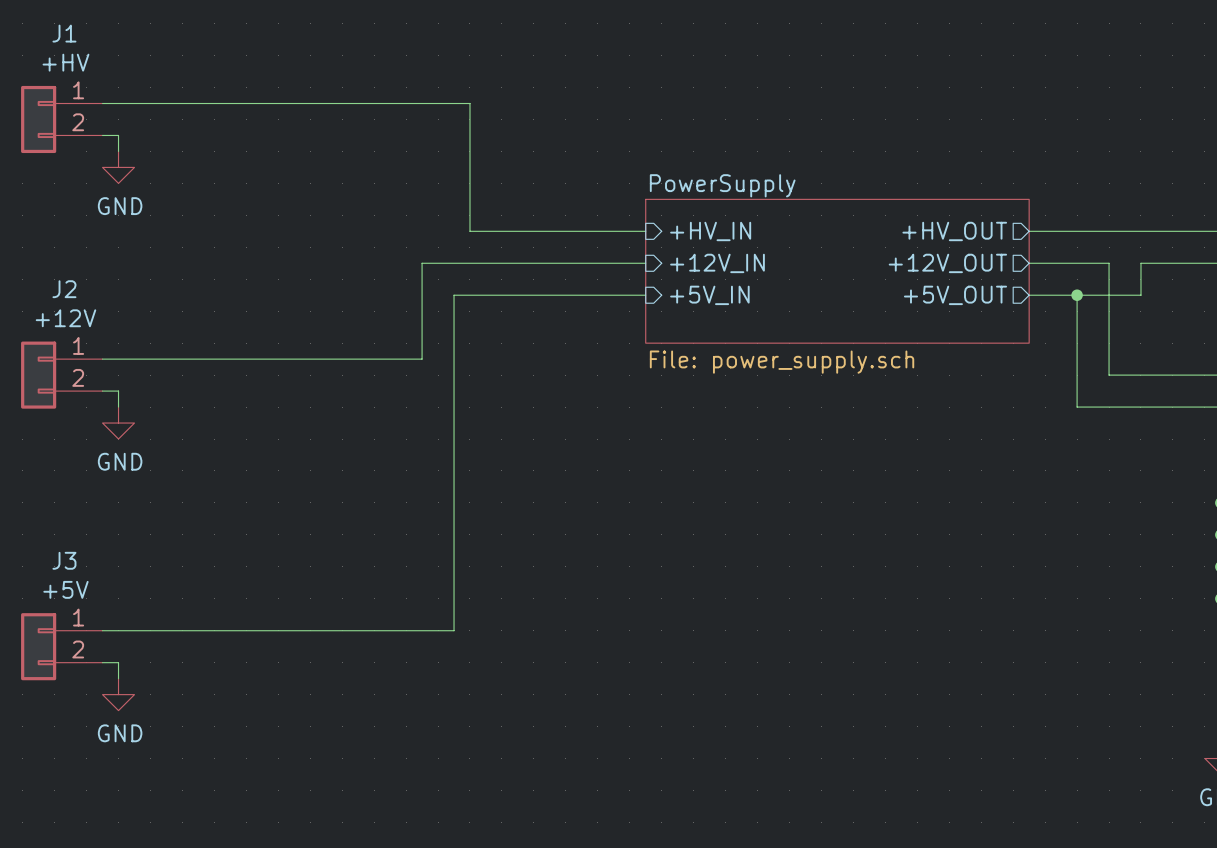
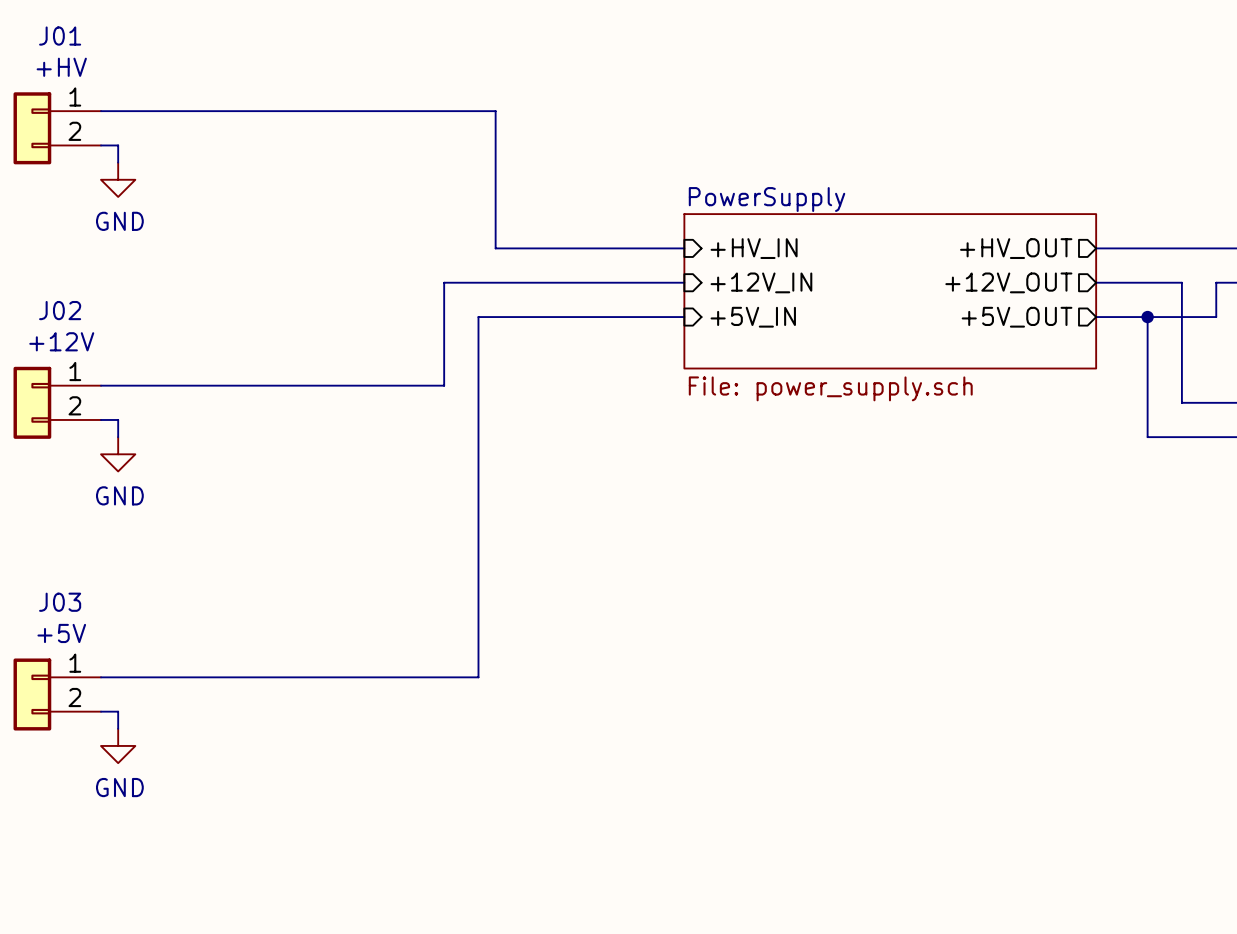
J1 name: J1 (64, 33) -> J01 (60, 36)
J2 name: J2 (64, 289) -> J02 (60, 310)
J3 name: J3 (64, 560) -> J03 (60, 602)

